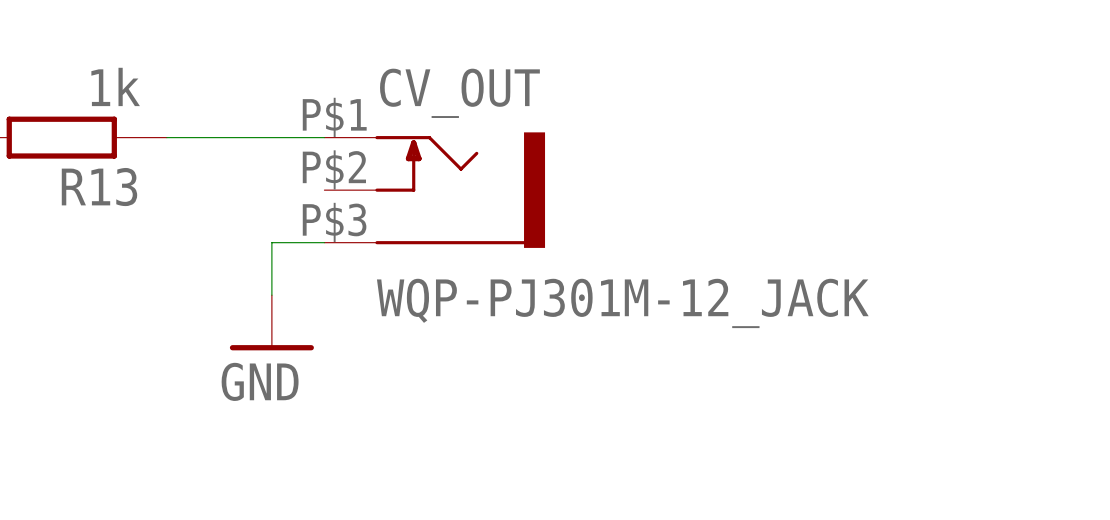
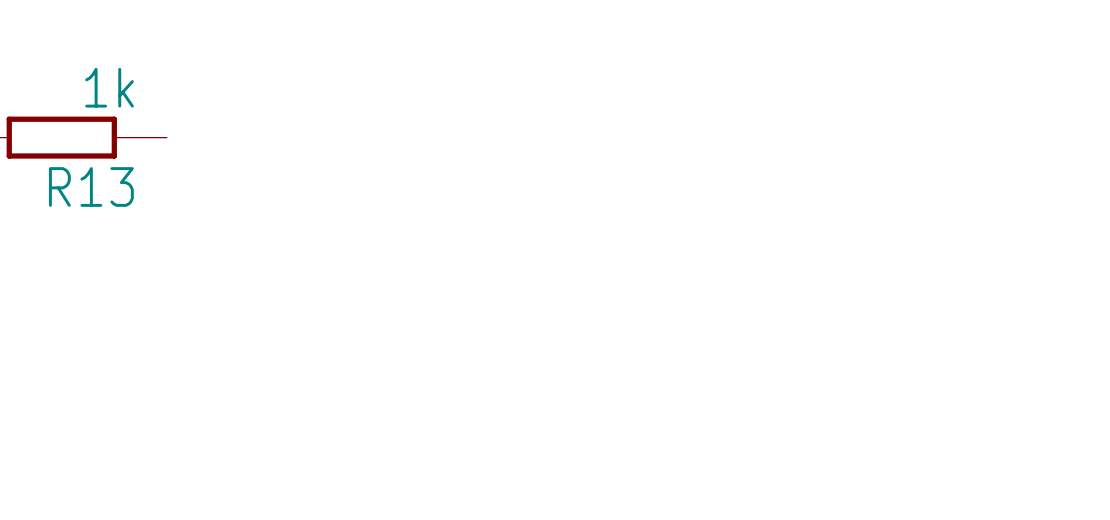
wire: (166, 137) (324, 137) -> none
CV_OUT: WQP-PJ301M-12_JACK (434, 190) -> none
wire: (324, 242) (271, 242) (271, 295) -> none
power symbol: GND (271, 322) -> none

